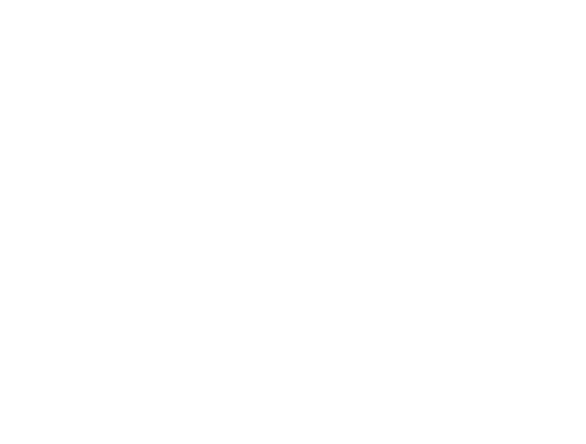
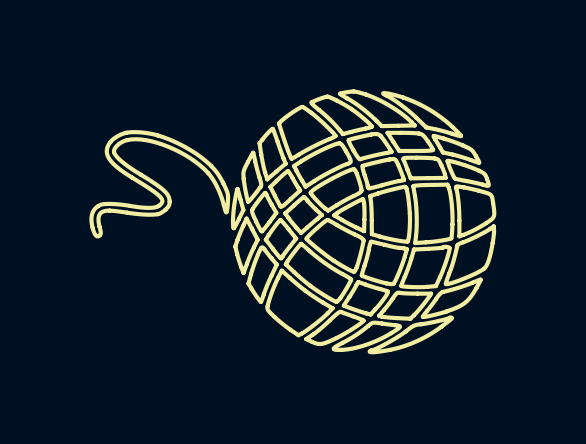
line: none -> (353, 91) (340, 93) (361, 107) (381, 126) (414, 125) (402, 114) (384, 102) (353, 91)
line: none -> (386, 95) (383, 93) (400, 96) (423, 106) (444, 120) (461, 135) (426, 127) (406, 109) (386, 95)
line: none -> (327, 96) (311, 103) (342, 134) (371, 126) (351, 109) (327, 96)
line: none -> (302, 106) (279, 123) (291, 158) (335, 135) (318, 118) (302, 106)
line: none -> (272, 128) (259, 143) (267, 179) (285, 163) (272, 128)
line: none -> (126, 132) (143, 132) (161, 136) (183, 146) (203, 159) (217, 172) (226, 190) (228, 197) (226, 212) (214, 181) (195, 161) (179, 152) (156, 142) (140, 139) (127, 140) (116, 146) (114, 150) (114, 154) (125, 164) (163, 190) (168, 197) (169, 204) (163, 211) (155, 214) (103, 211) (98, 217) (100, 234) (96, 235) (92, 228) (91, 217) (93, 210) (99, 205) (113, 204) (150, 207) (158, 206) (162, 201) (156, 193) (120, 169) (108, 158) (106, 151) (109, 143) (115, 137) (126, 132)
line: none -> (401, 132) (387, 132) (399, 150) (432, 149) (421, 134) (401, 132)
line: none -> (371, 134) (380, 135) (391, 151) (359, 159) (348, 140) (371, 134)
line: none -> (433, 135) (442, 152) (479, 162) (469, 148) (433, 135)
line: none -> (339, 143) (317, 152) (294, 166) (305, 186) (350, 162) (345, 149) (339, 143)
line: none -> (253, 152) (243, 172) (248, 201) (261, 185) (253, 152)
line: none -> (416, 157) (437, 159) (445, 177) (410, 178) (403, 158) (416, 157)
line: none -> (389, 159) (362, 166) (368, 188) (403, 180) (396, 160) (389, 159)
line: none -> (447, 161) (454, 178) (488, 185) (485, 176) (482, 172) (447, 161)
line: none -> (353, 169) (326, 181) (312, 190) (311, 193) (328, 210) (358, 193) (361, 189) (353, 169)
line: none -> (288, 171) (300, 190) (280, 206) (270, 186) (288, 171)
line: none -> (447, 184) (413, 186) (416, 216) (415, 243) (451, 238) (452, 208) (447, 184)
line: none -> (404, 186) (370, 196) (371, 234) (407, 241) (409, 213) (407, 193) (404, 186)
line: none -> (463, 187) (456, 186) (459, 236) (484, 224) (492, 218) (494, 214) (490, 194) (463, 187)
line: none -> (237, 189) (233, 211) (233, 228) (243, 209) (237, 189)
line: none -> (265, 192) (276, 212) (261, 231) (252, 210) (265, 192)
line: none -> (303, 197) (285, 213) (301, 232) (321, 215) (303, 197)
line: none -> (362, 199) (364, 231) (334, 215) (344, 208) (362, 199)
line: none -> (246, 218) (235, 246) (243, 273) (257, 239) (246, 218)
line: none -> (280, 219) (265, 239) (280, 258) (296, 238) (280, 219)
line: none -> (327, 219) (306, 238) (331, 259) (354, 271) (363, 239) (327, 219)
line: none -> (493, 226) (491, 250) (485, 267) (466, 277) (445, 283) (457, 244) (493, 226)
line: none -> (371, 241) (406, 249) (393, 283) (361, 275) (371, 241)
line: none -> (301, 243) (325, 263) (351, 279) (336, 301) (311, 286) (285, 264) (301, 243)
line: none -> (443, 247) (413, 249) (401, 285) (435, 286) (449, 250) (448, 247) (443, 247)
line: none -> (261, 248) (248, 283) (260, 301) (276, 264) (263, 248) (261, 248)
line: none -> (281, 270) (271, 292) (267, 308) (278, 320) (298, 335) (316, 322) (332, 308) (306, 291) (281, 270)
line: none -> (480, 279) (472, 294) (463, 303) (444, 312) (422, 316) (441, 292) (480, 279)
line: none -> (358, 282) (343, 305) (370, 314) (387, 291) (358, 282)
line: none -> (400, 292) (396, 293) (379, 315) (410, 318) (431, 293) (400, 292)
line: none -> (340, 311) (363, 320) (344, 333) (324, 343) (317, 343) (306, 339) (340, 311)
line: none -> (451, 318) (432, 332) (413, 342) (390, 349) (369, 351) (392, 340) (414, 325) (451, 318)
line: none -> (382, 323) (371, 323) (333, 349) (346, 349) (365, 344) (385, 336) (399, 326) (382, 323)

